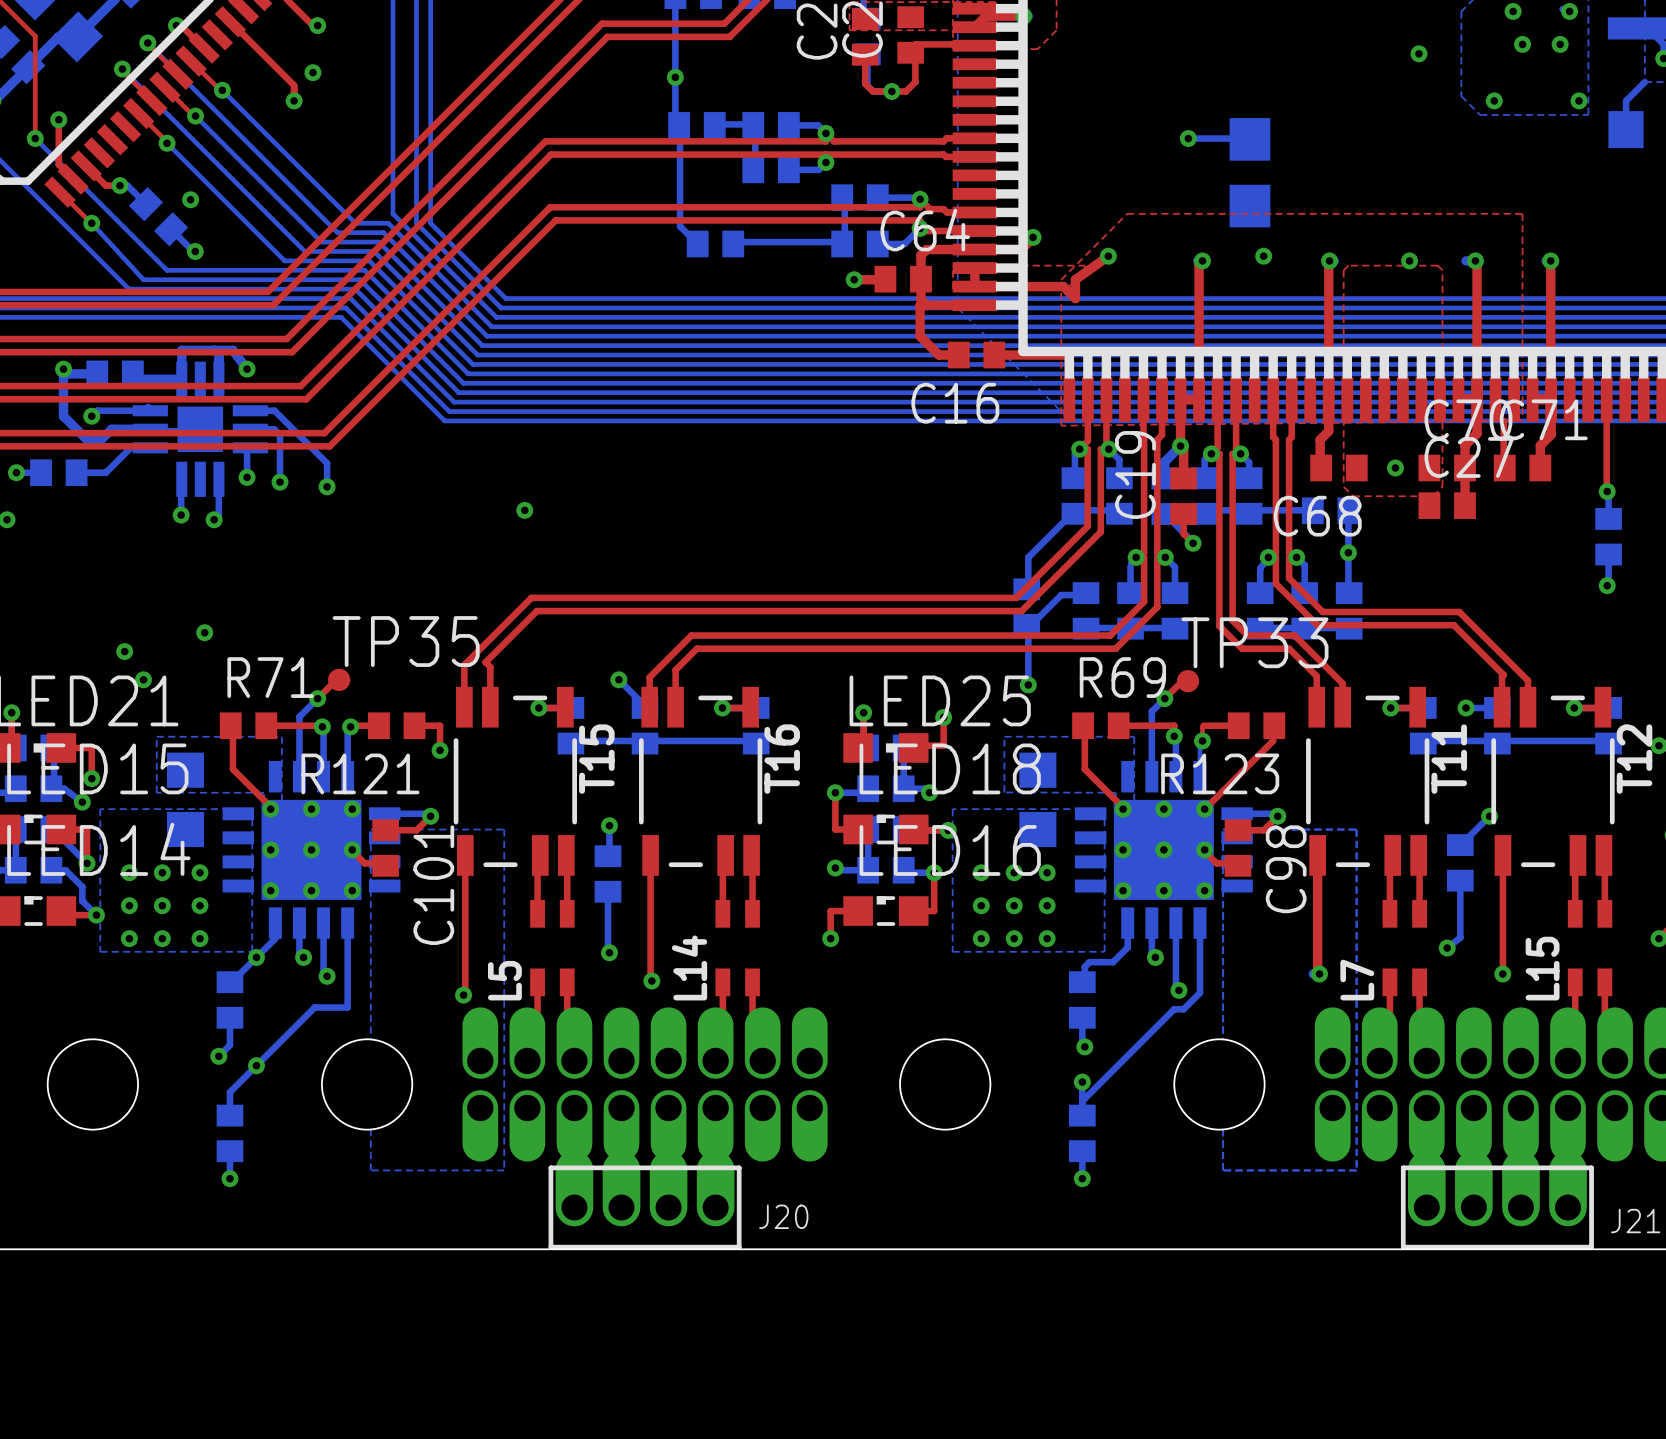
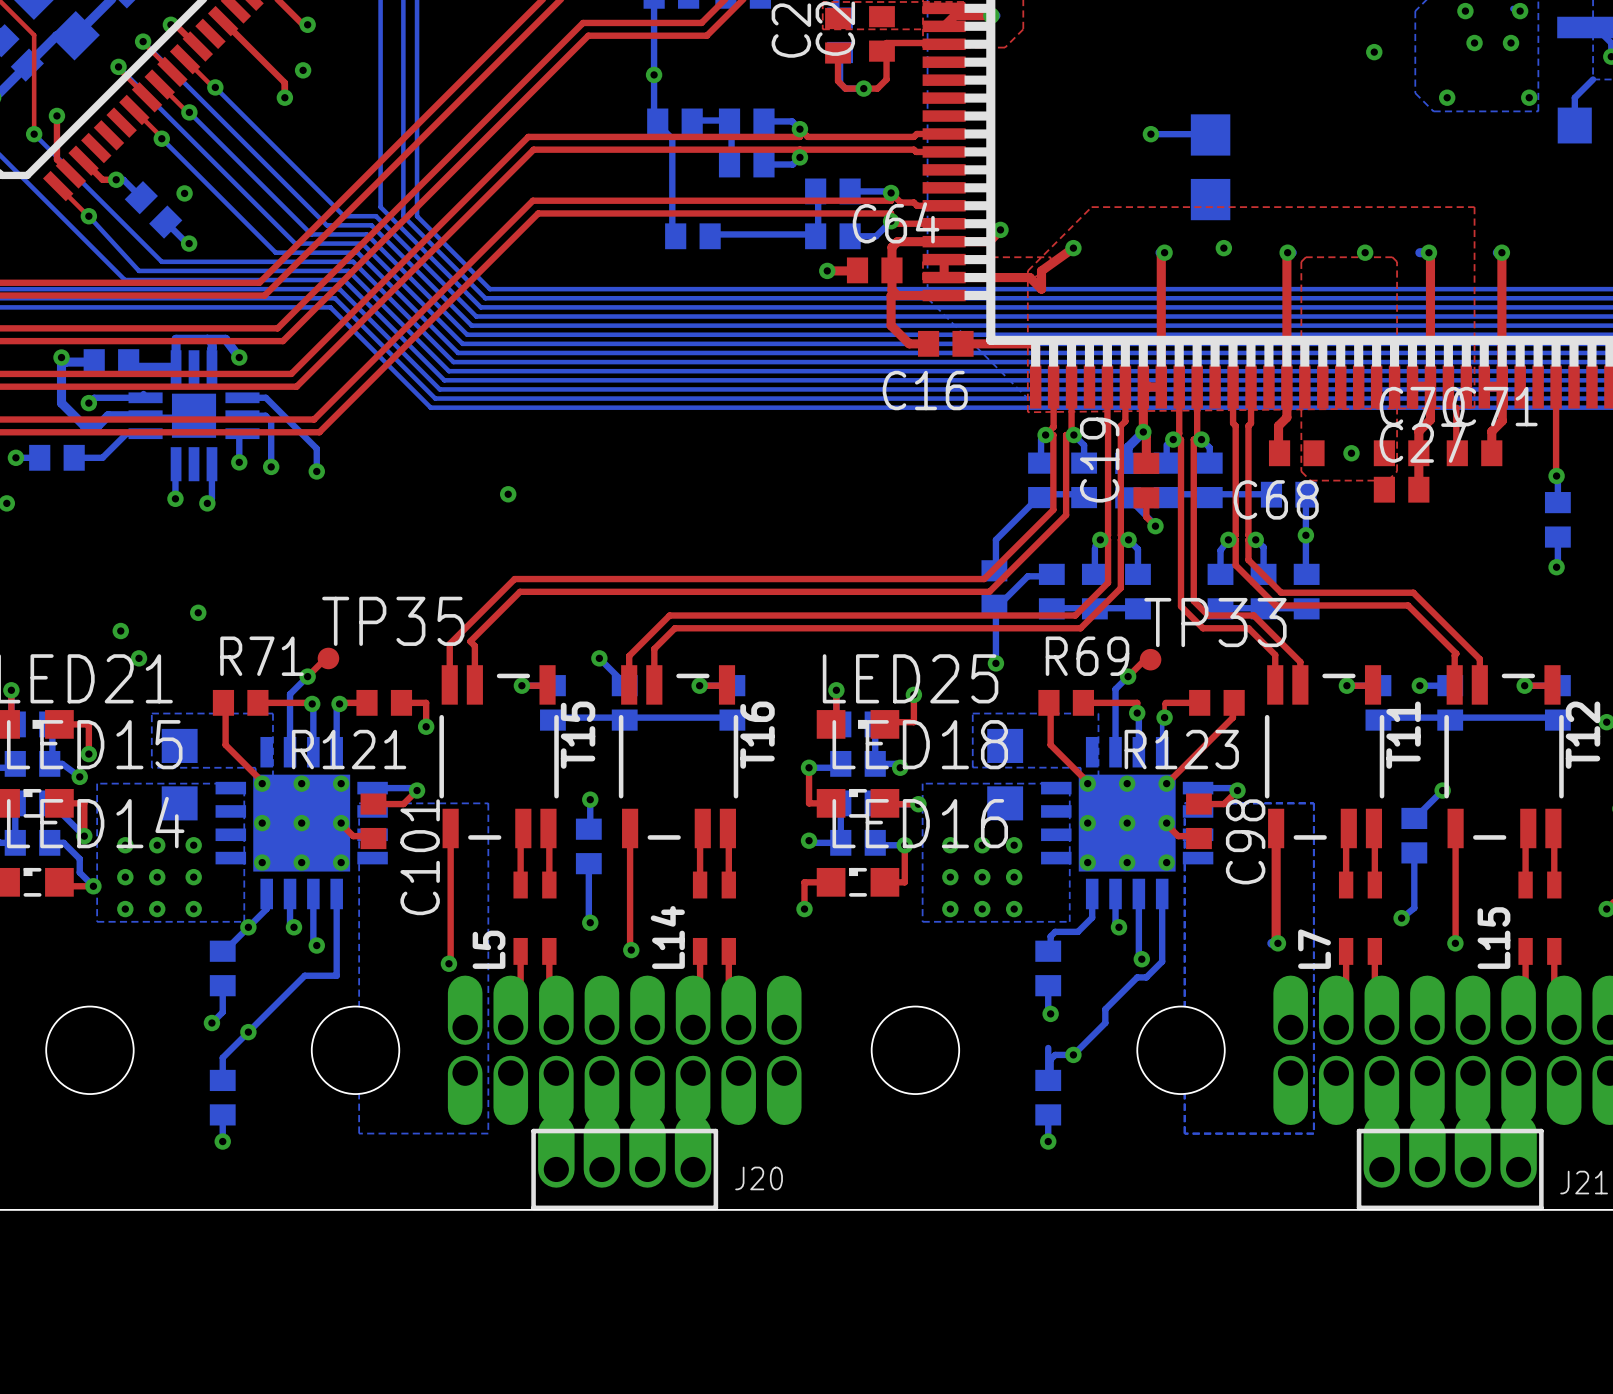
bottom track: (680, 129) (680, 226) (697, 243) -> (658, 125) (672, 138) (672, 234)
bottom track: (1141, 1042) (1082, 1101) -> (1105, 1009) (1105, 1023) (1073, 1054) (1055, 1054) (1050, 1059) (1050, 1077) (1048, 1080)
via position: (1082, 1082) -> (1073, 1054)

